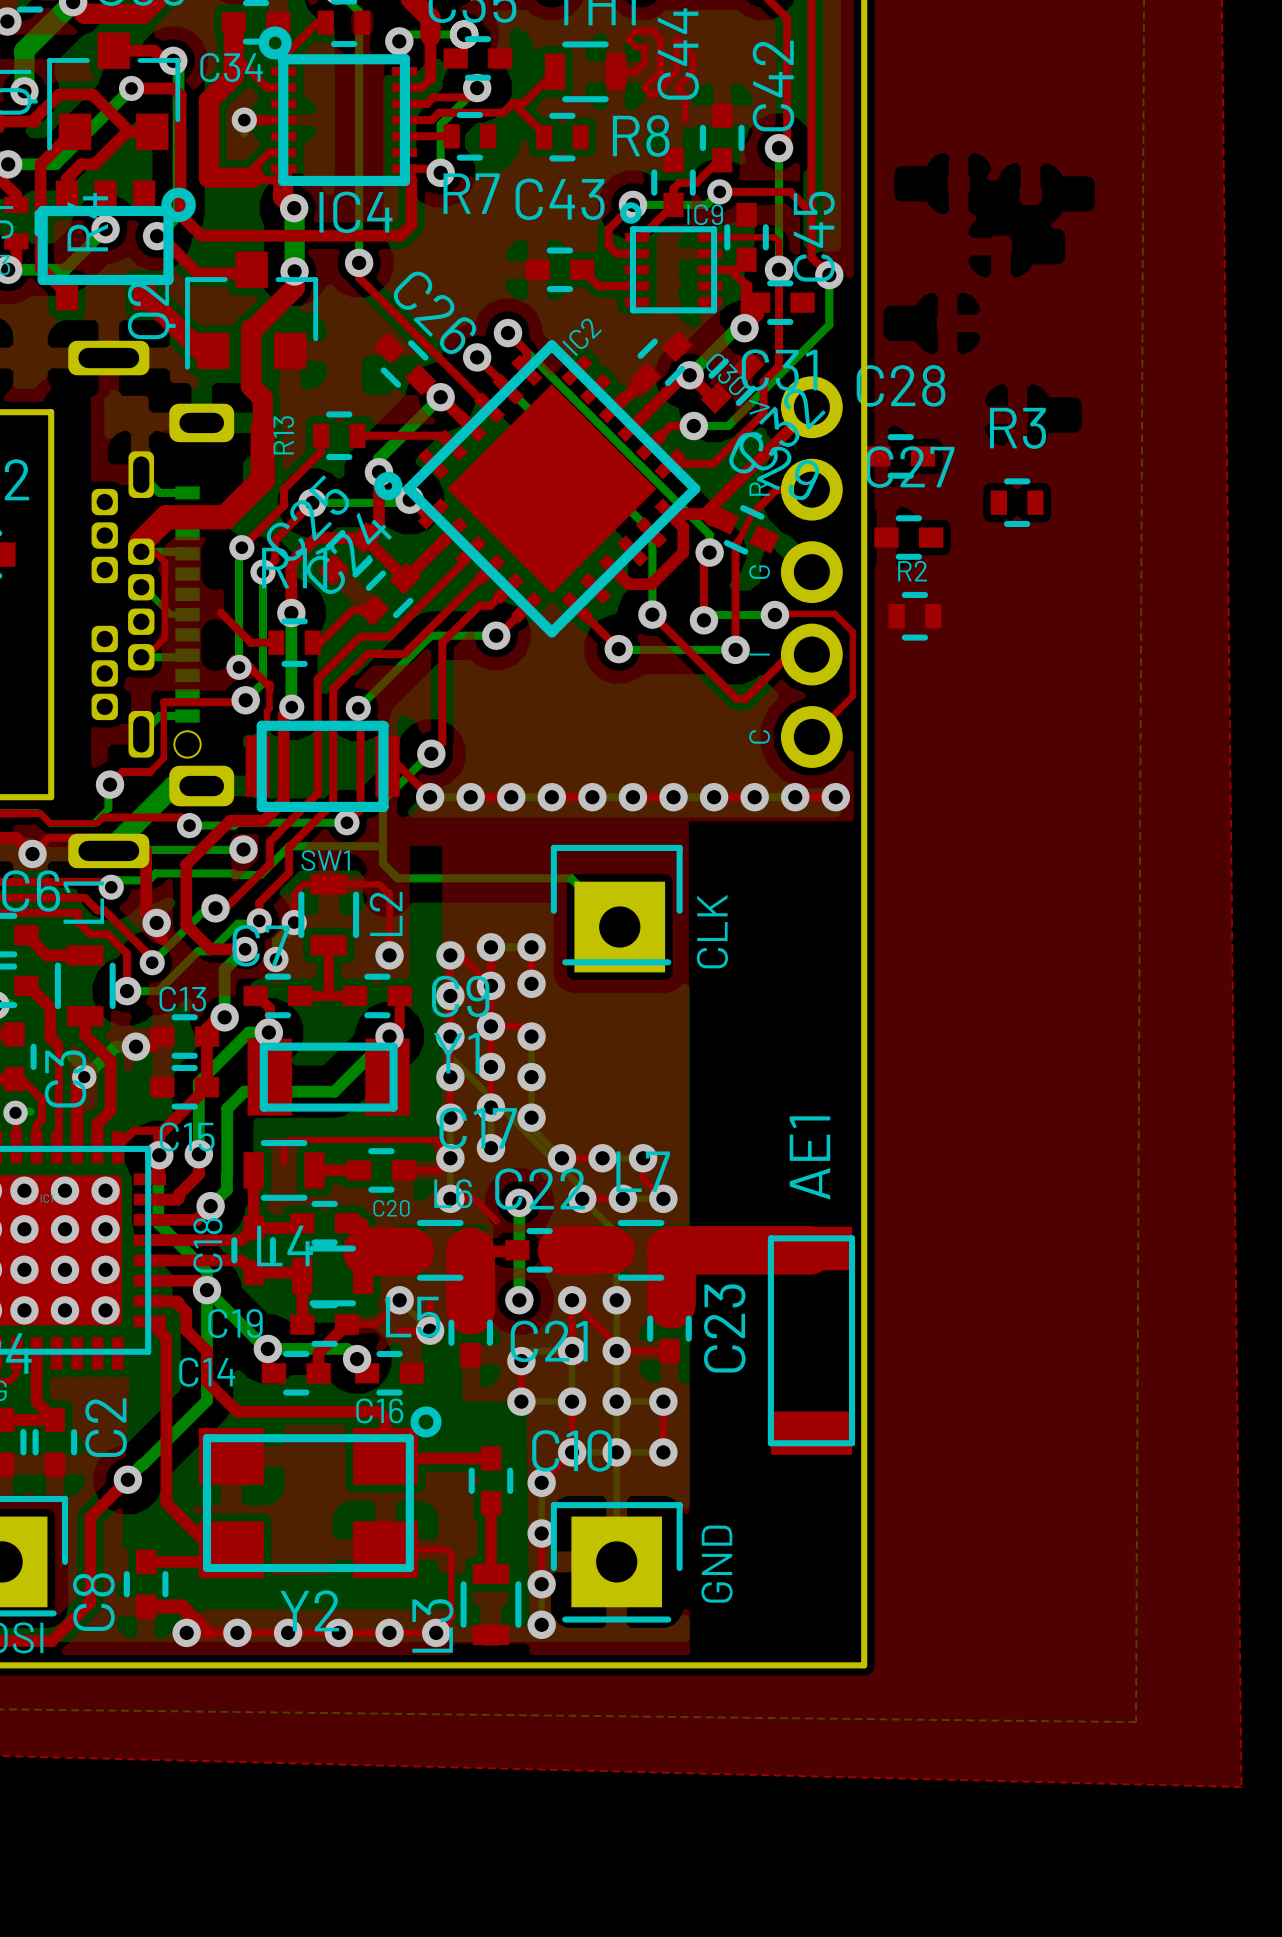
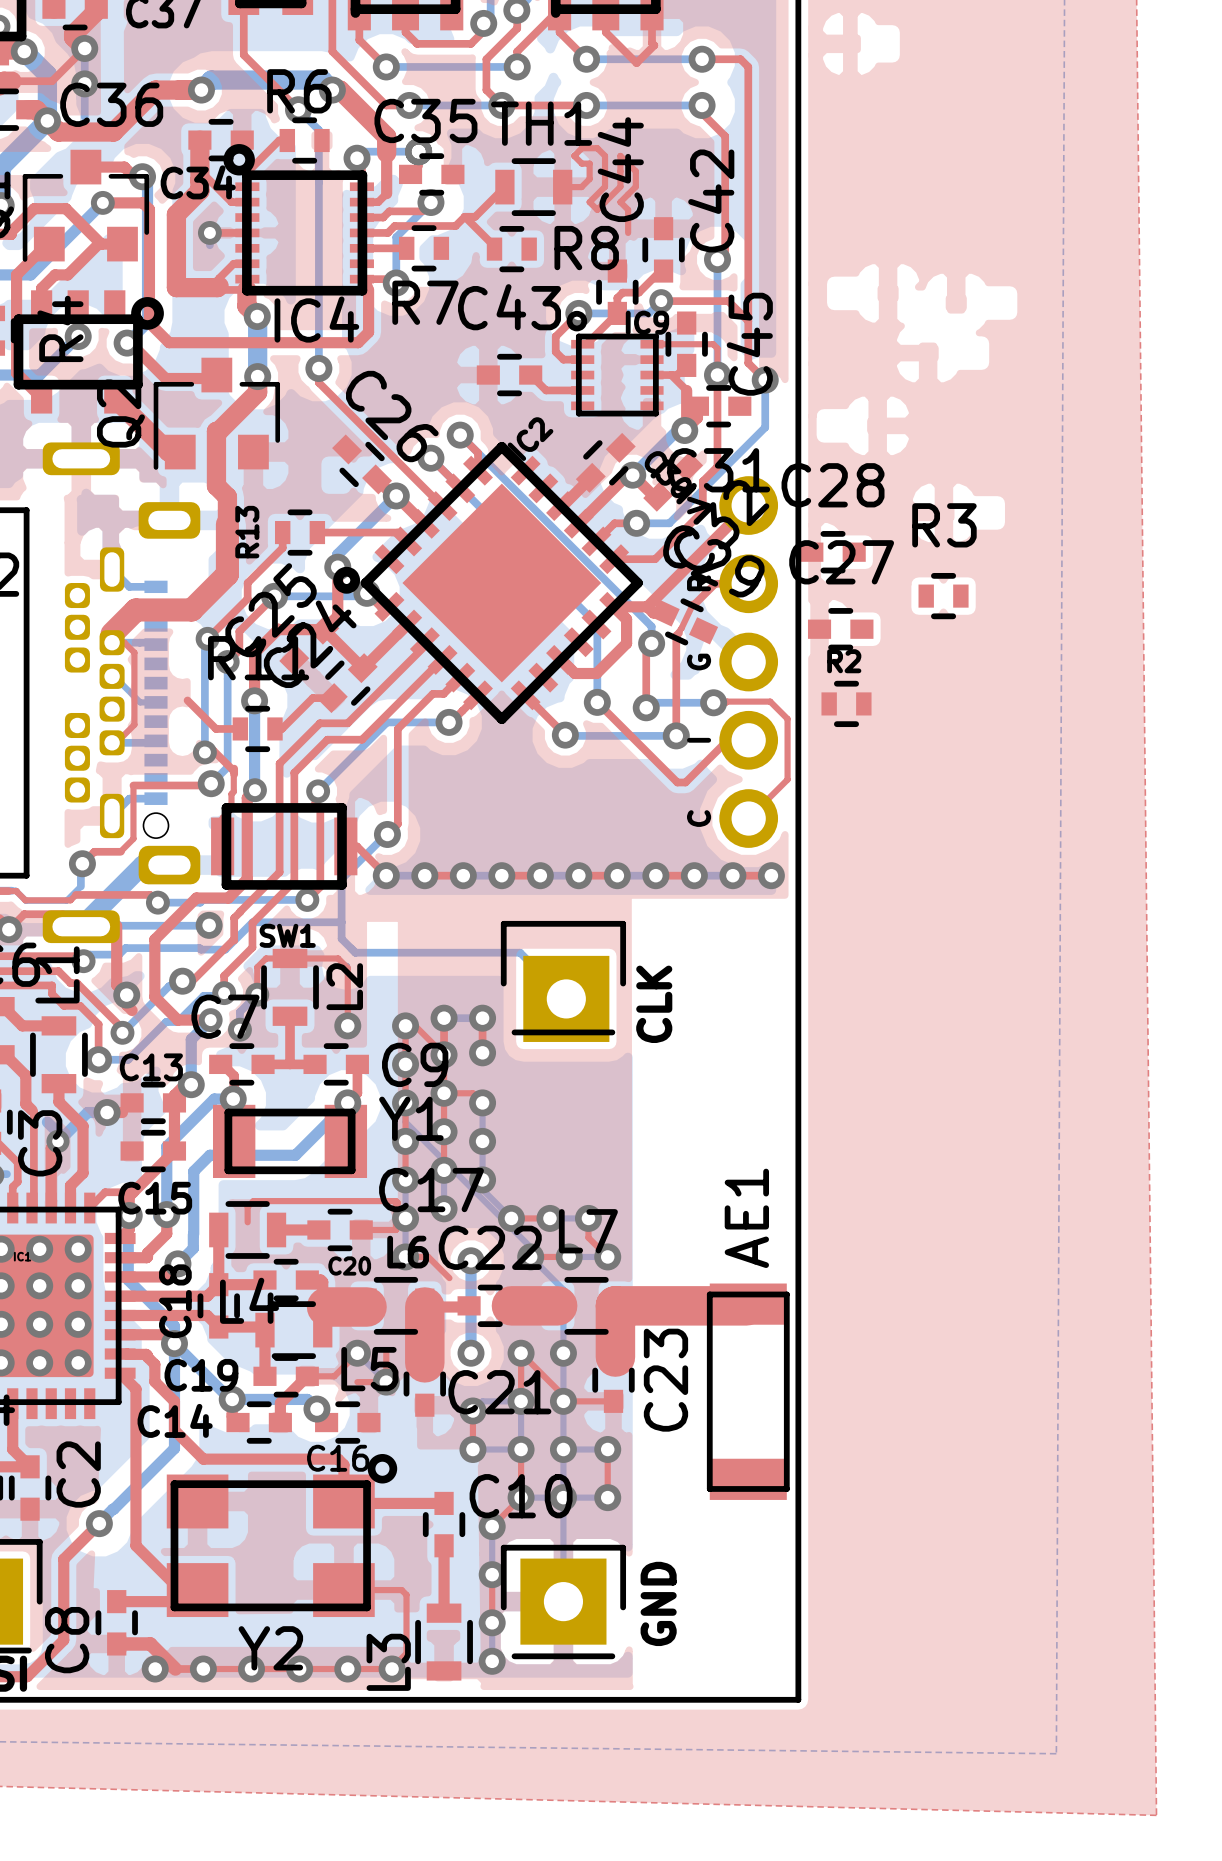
top track width: thick (561, 1250) (610, 1250) -> thin (511, 1305) (557, 1305)
top track width: thick (809, 1250) (671, 1250) (671, 1304) -> thin (746, 1305) (615, 1305) (615, 1357)
top track width: thick (367, 1251) (409, 1251) -> thin (326, 1307) (367, 1307)
top track width: thick (470, 1251) (470, 1310) -> thin (424, 1307) (424, 1362)

